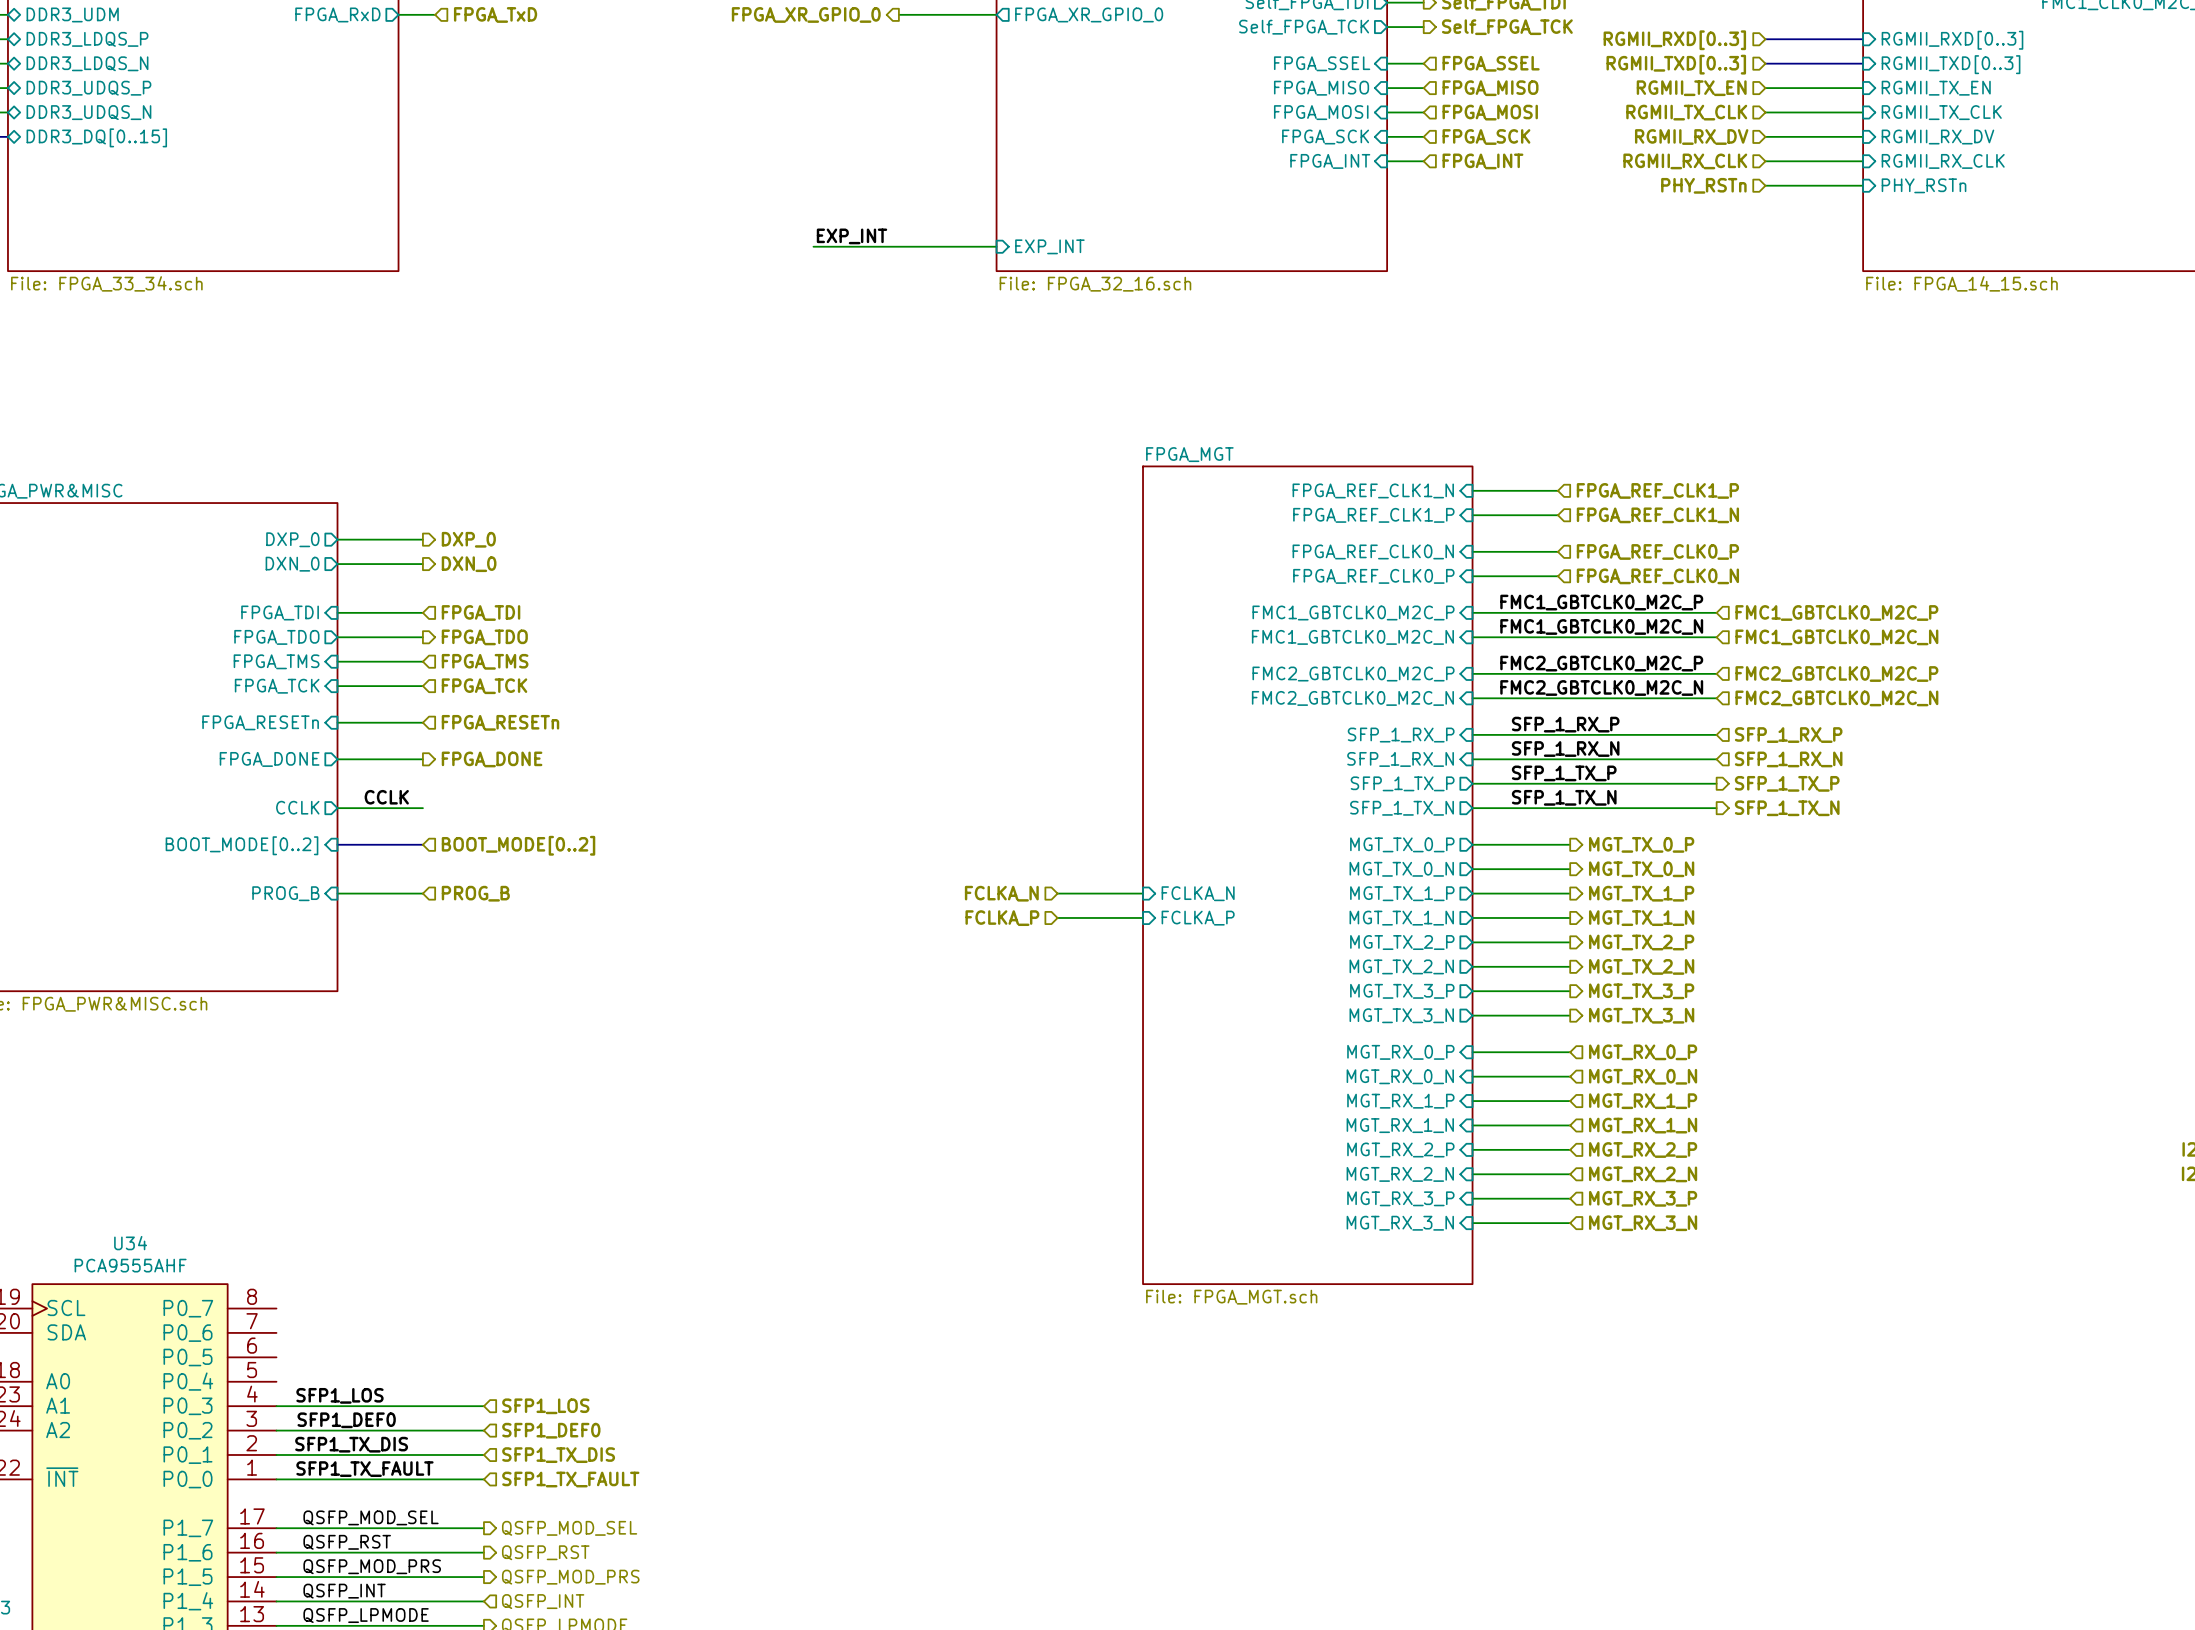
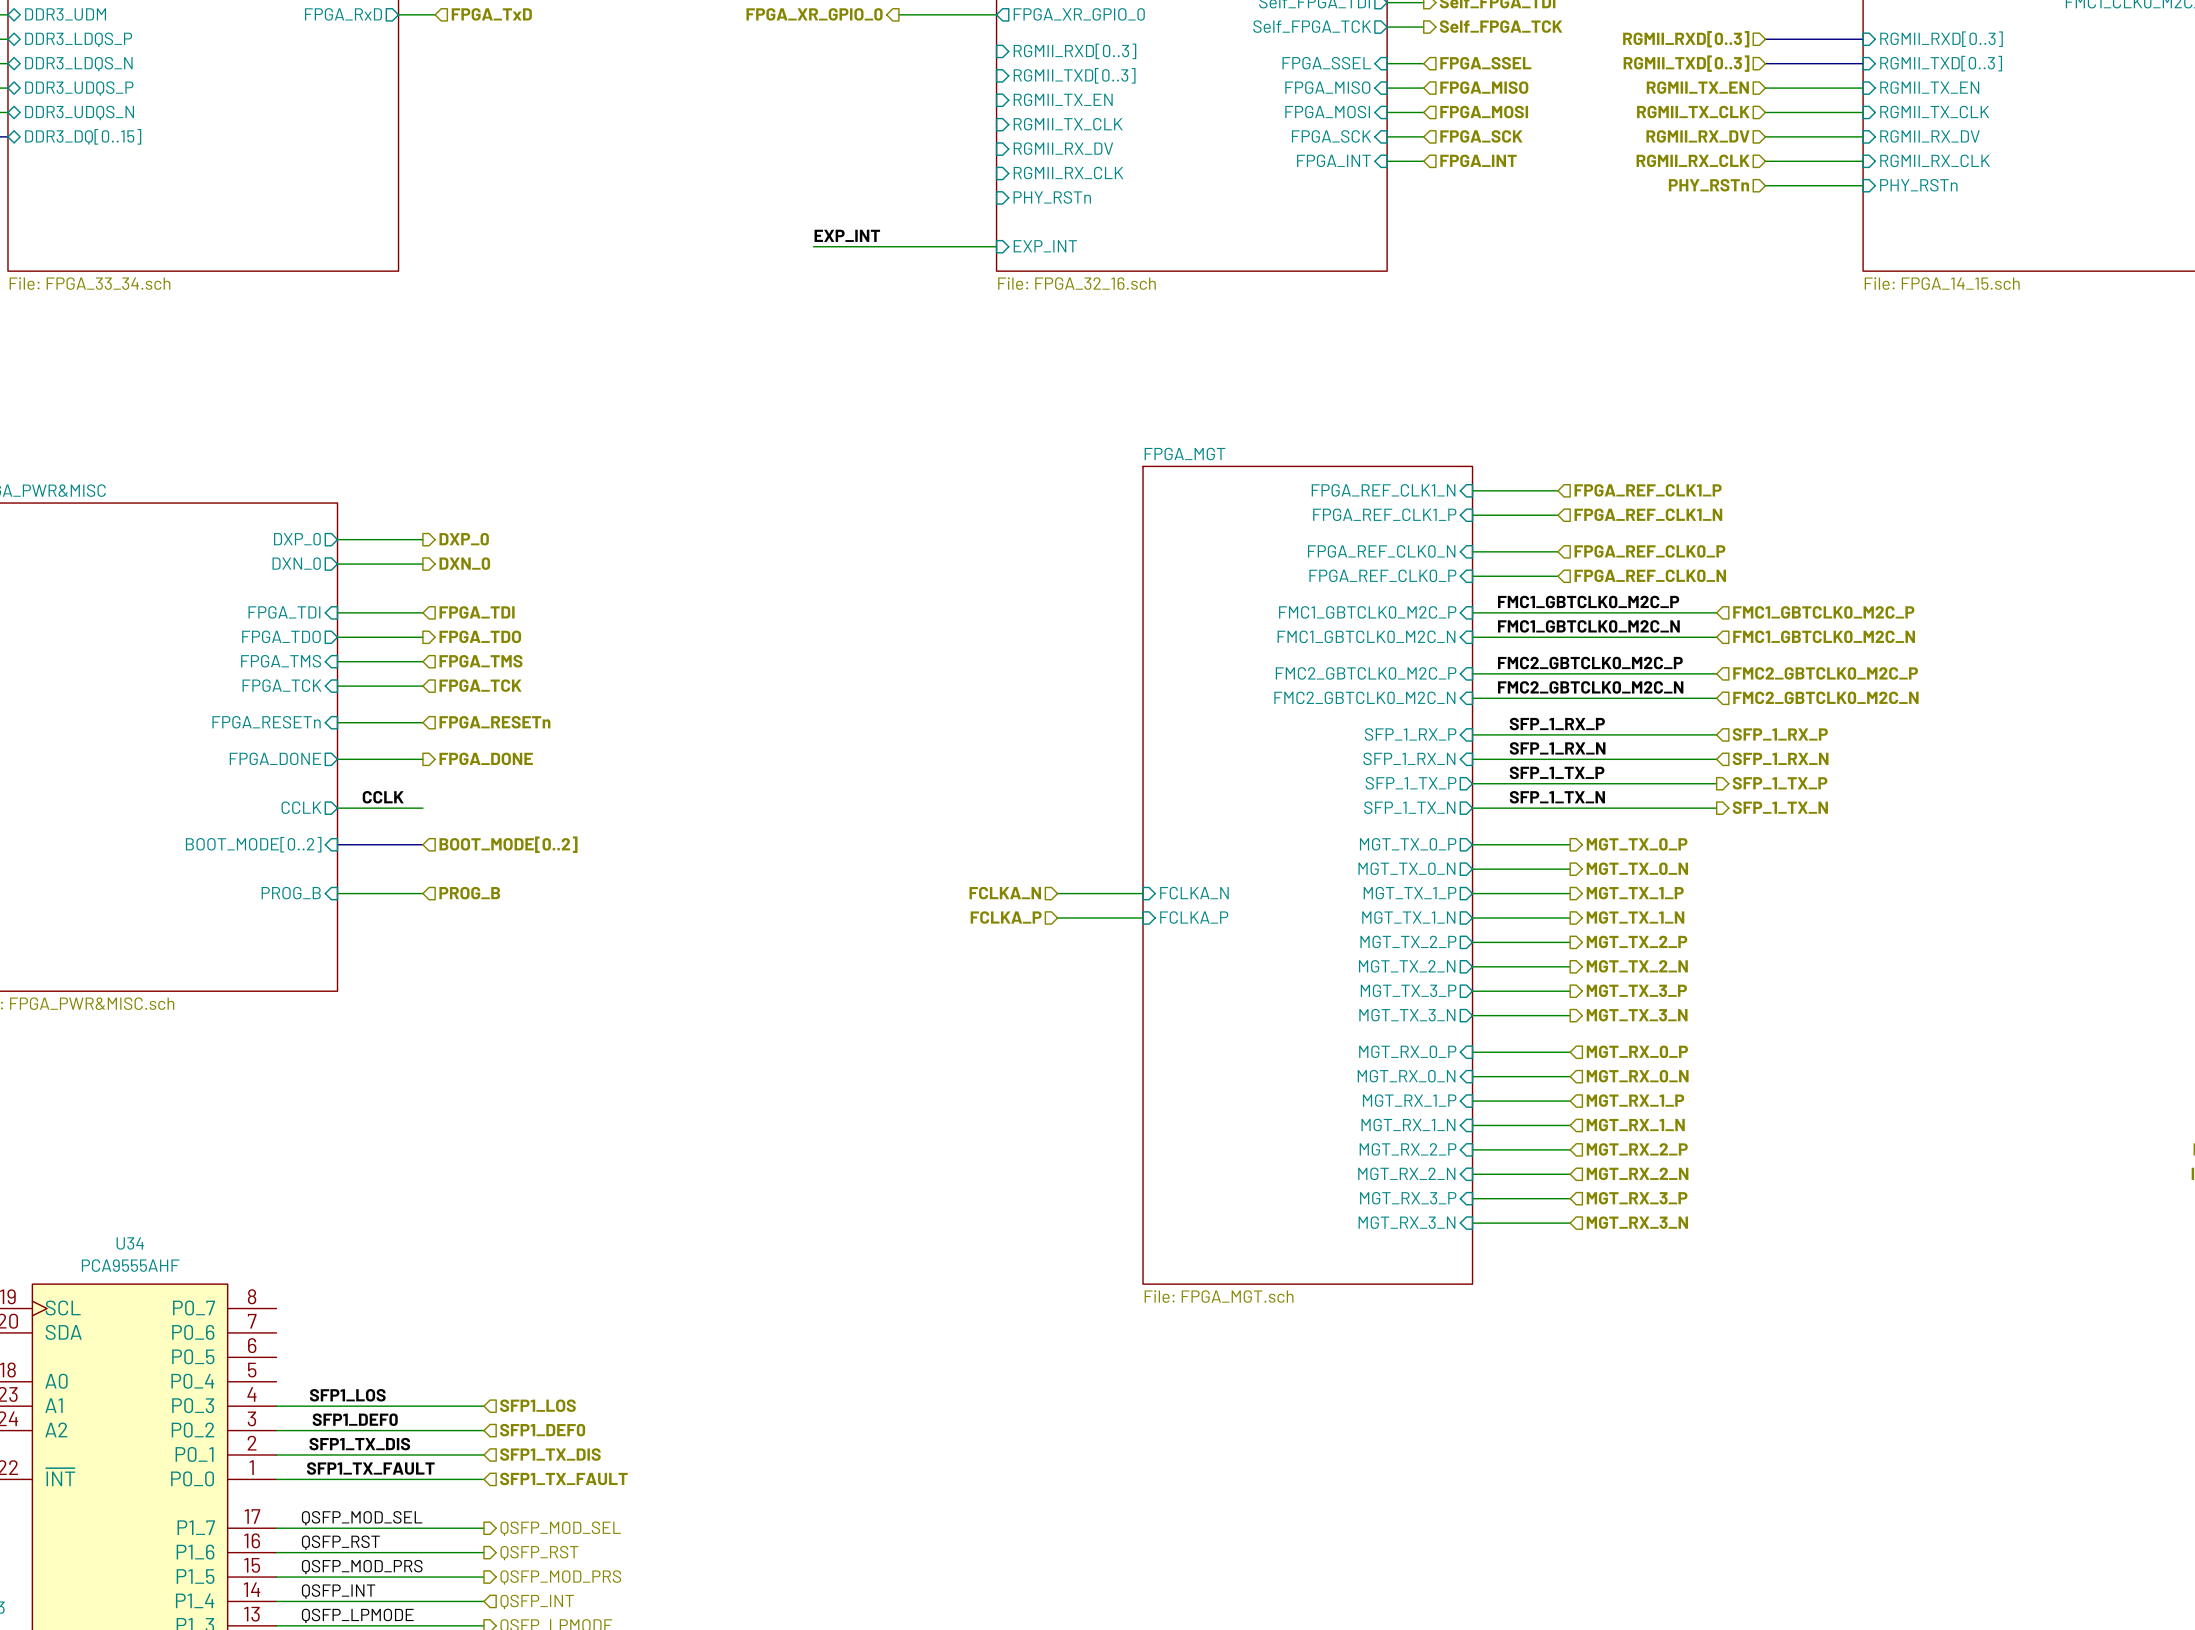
sheet pin: none -> RGMII_RXD[0..3] (1074, 51)
sheet pin: none -> RGMII_TXD[0..3] (1074, 75)
sheet pin: none -> RGMII_TX_EN (1063, 99)
sheet pin: none -> RGMII_TX_CLK (1068, 124)
sheet pin: none -> RGMII_RX_DV (1063, 148)
sheet pin: none -> RGMII_RX_CLK (1068, 173)
sheet pin: none -> PHY_RSTn (1052, 197)

